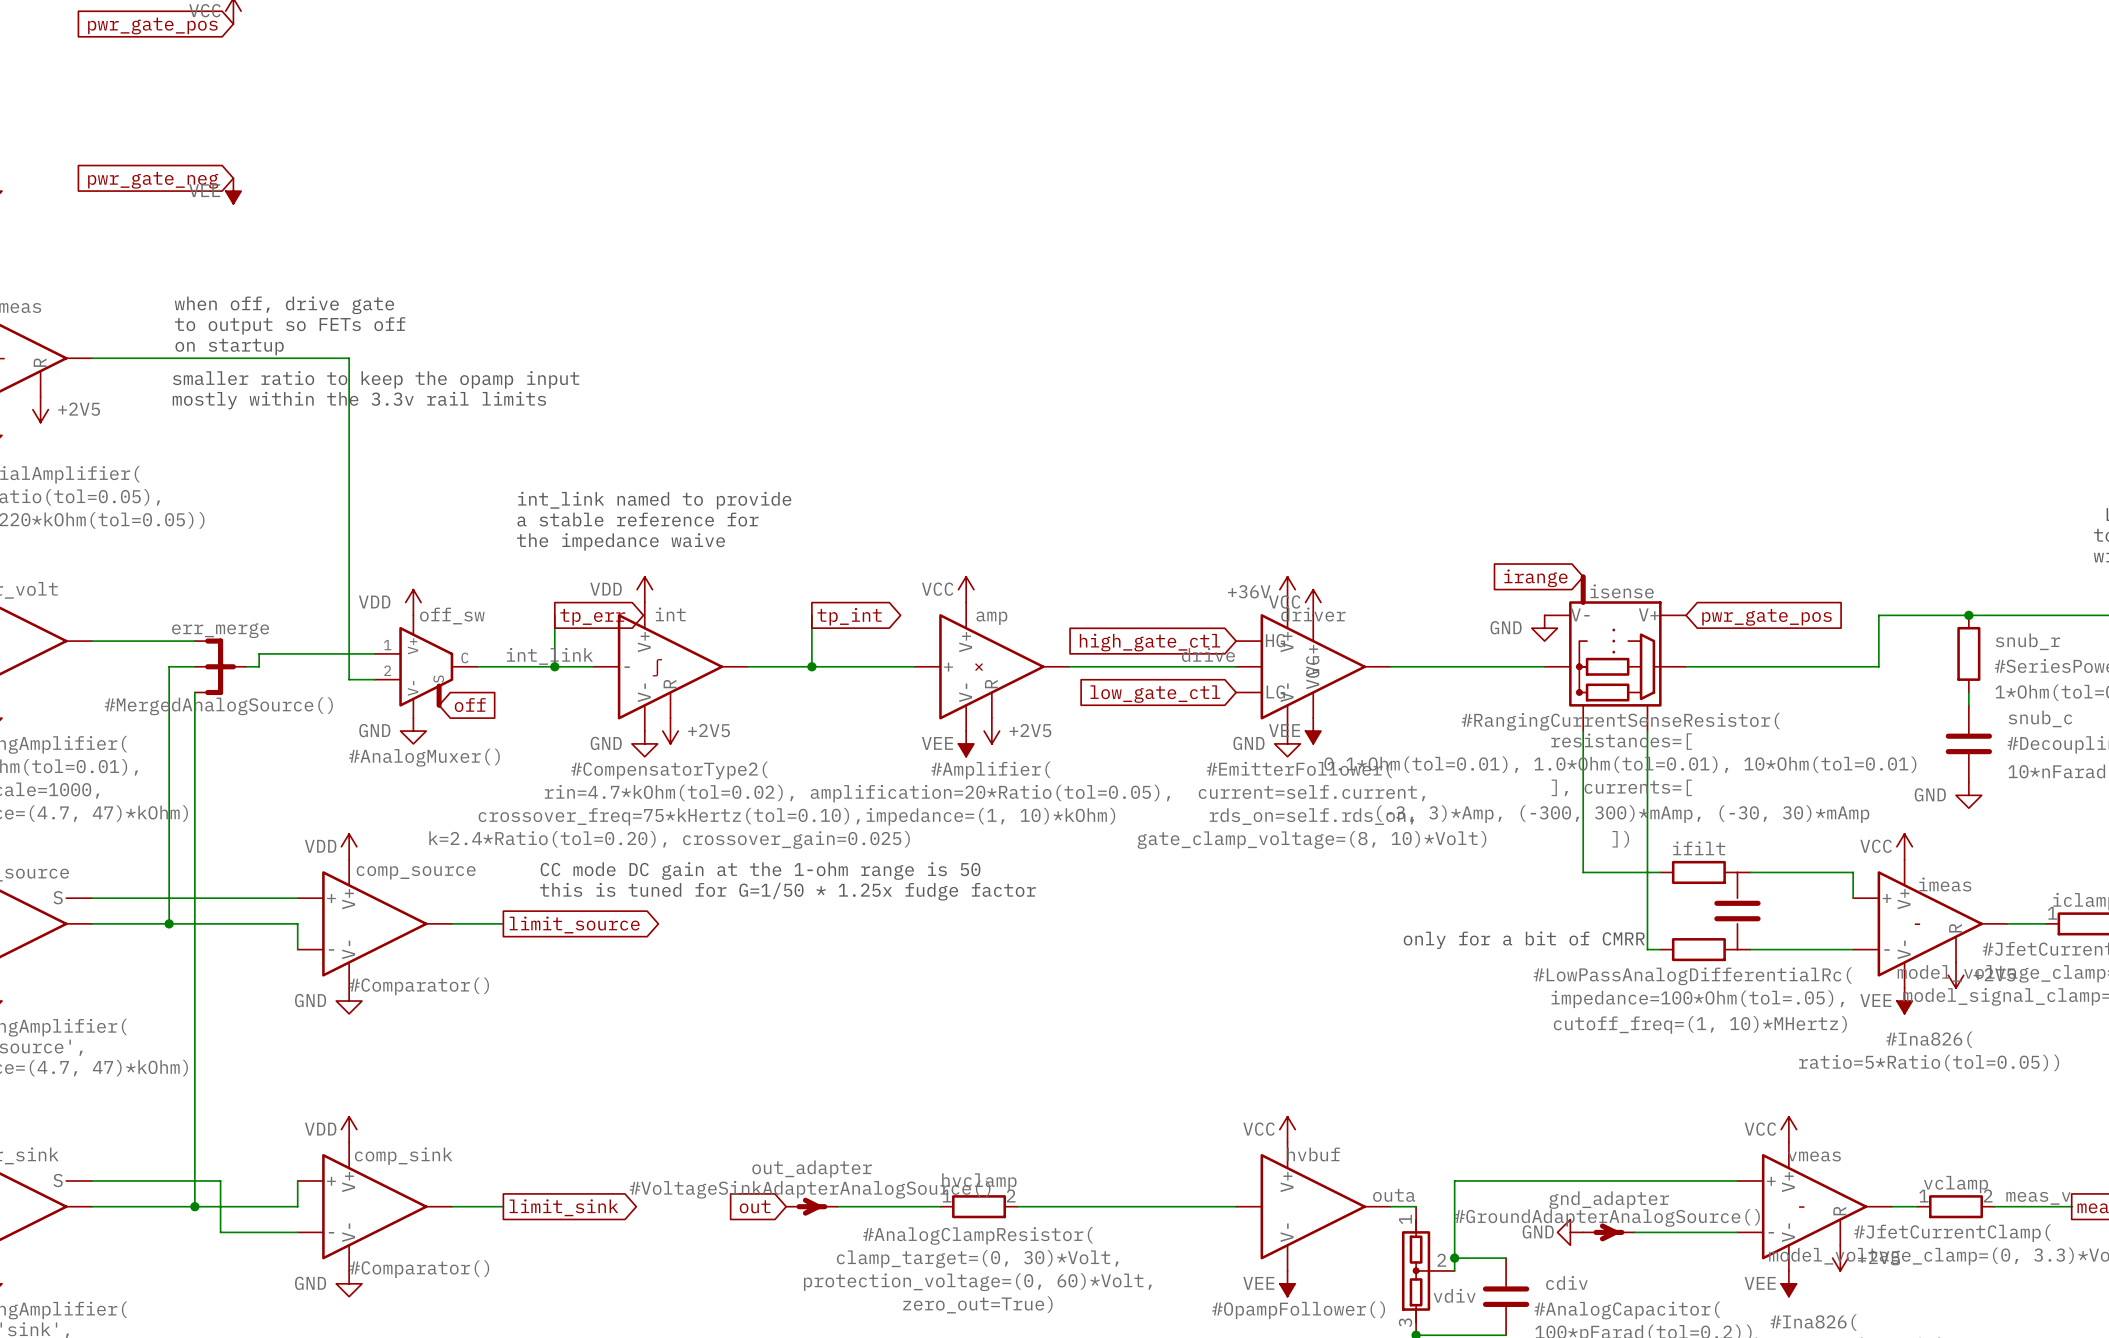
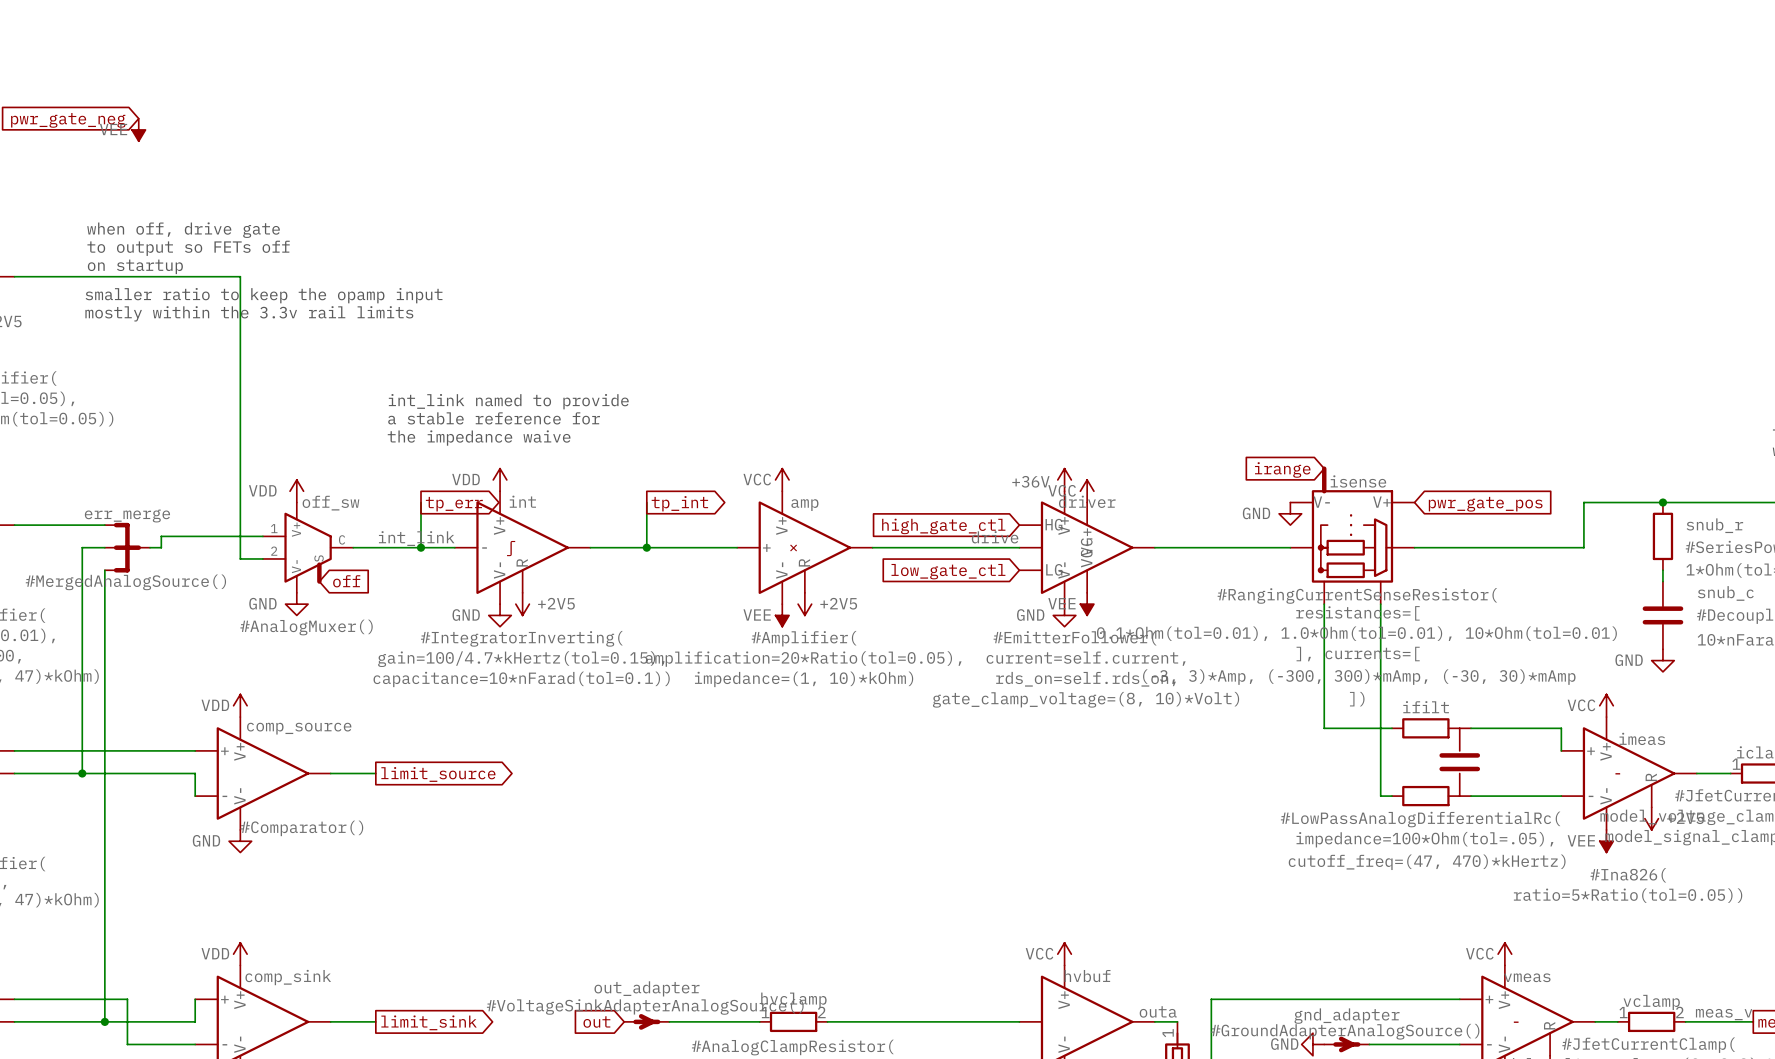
int value: #CompensatorType2( (669, 770) -> #IntegratorInverting( (521, 638)
int text: rin=4.7*kOhm(tol=0.02), (669, 793) -> gain=100/4.7*kHertz(tol=0.15), (521, 659)
int text: crossover_freq=75*kHertz(tol=0.10), (669, 816) -> capacitance=10*nFarad(tol=0.1)) (521, 679)
int text: k=2.4*Ratio(tol=0.20), crossover_gain=0.025) (669, 839) -> none
text: CC mode DC gain at the 1-ohm range is 50 (760, 871) -> none
text: this is tuned for G=1/50 * 1.25x fudge factor (788, 891) -> none
text: only for a bit of CMRR (1524, 940) -> none
ifilt text: cutoff_freq=(1, 10)*MHertz) (1700, 1024) -> cutoff_freq=(47, 470)*kHertz) (1427, 862)

